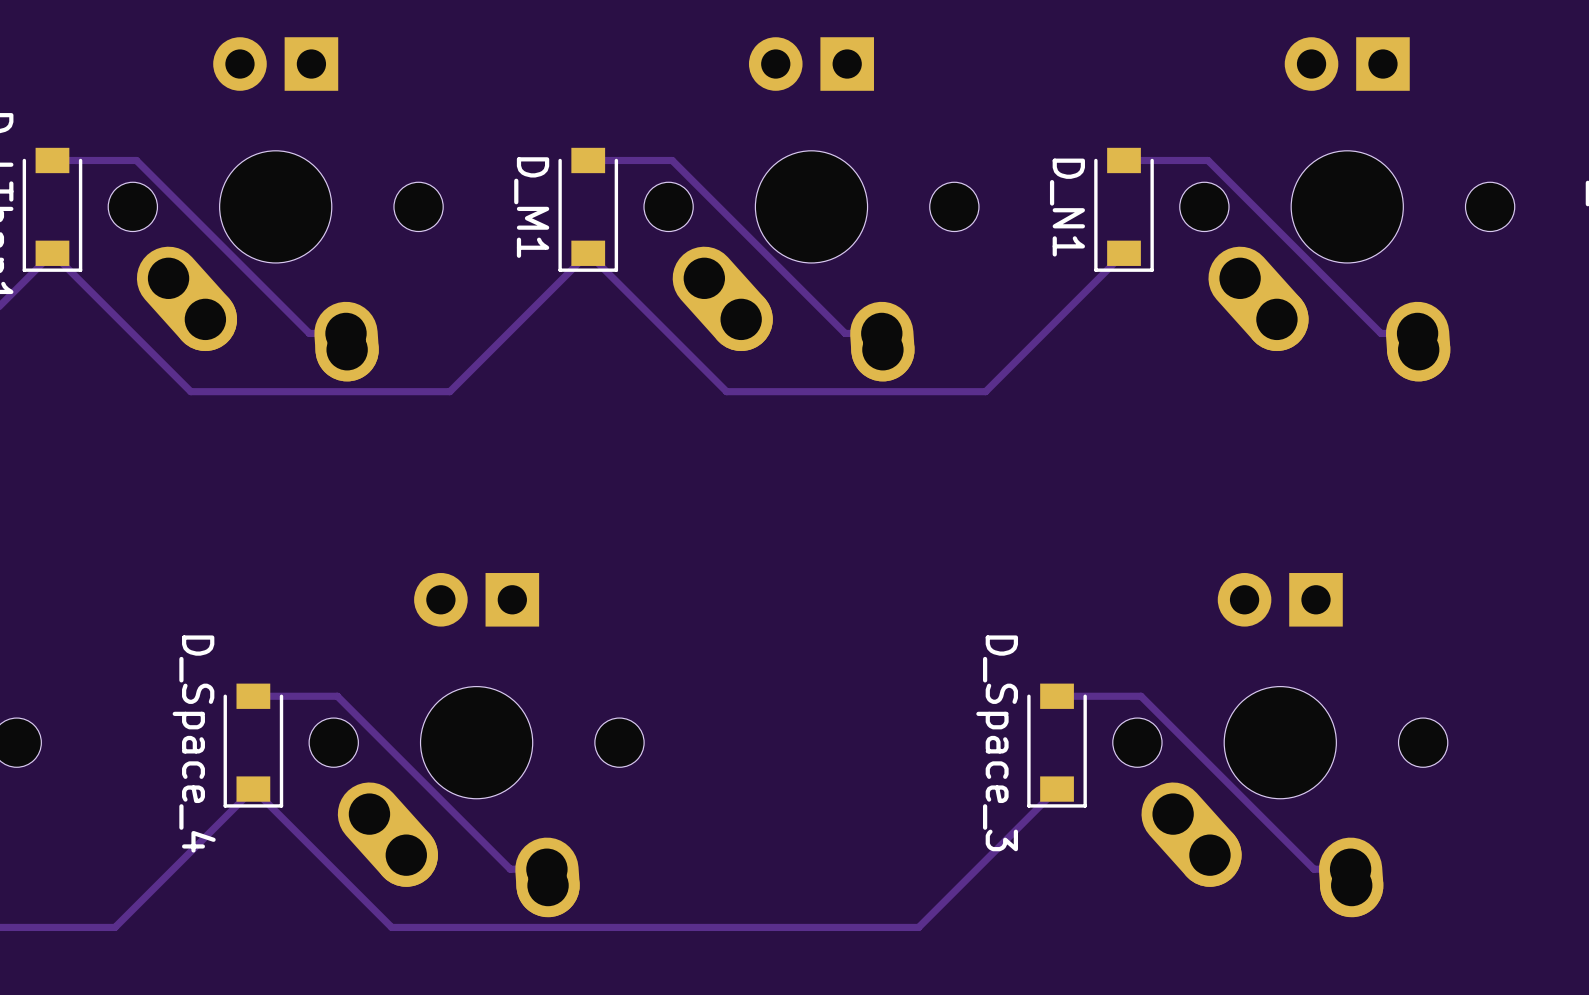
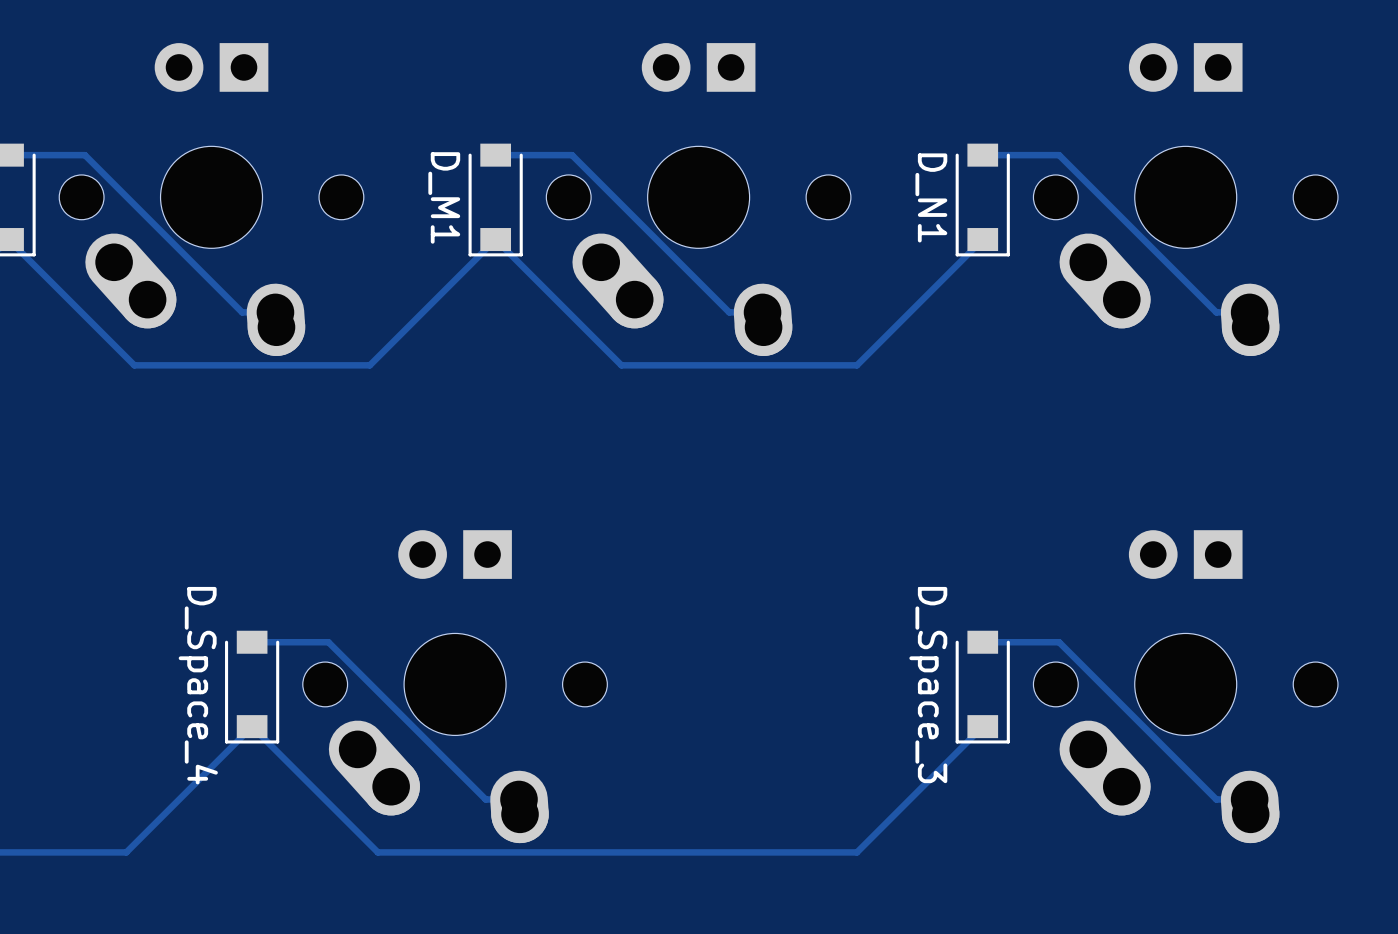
track: (320, 696) (253, 696) -> none
track: (337, 696) (510, 869) (546, 869) -> (267, 642) (328, 642) (485, 799) (518, 799)
track: (1124, 696) (1057, 696) -> none
track: (1141, 696) (1314, 869) (1350, 869) -> (998, 642) (1059, 642) (1216, 799) (1249, 799)
D_Space_4 position: (253, 745) -> (252, 687)
part position: (476, 745) -> (455, 686)
D_Space_3 position: (1057, 745) -> (982, 687)
part position: (1280, 745) -> (1185, 686)
track: (1057, 789) (918, 927) -> (982, 726) (856, 852) (796, 852)
track: (458, 927) (391, 927) (253, 789) (115, 927) -> (377, 852) (252, 726) (126, 852) (65, 852)

